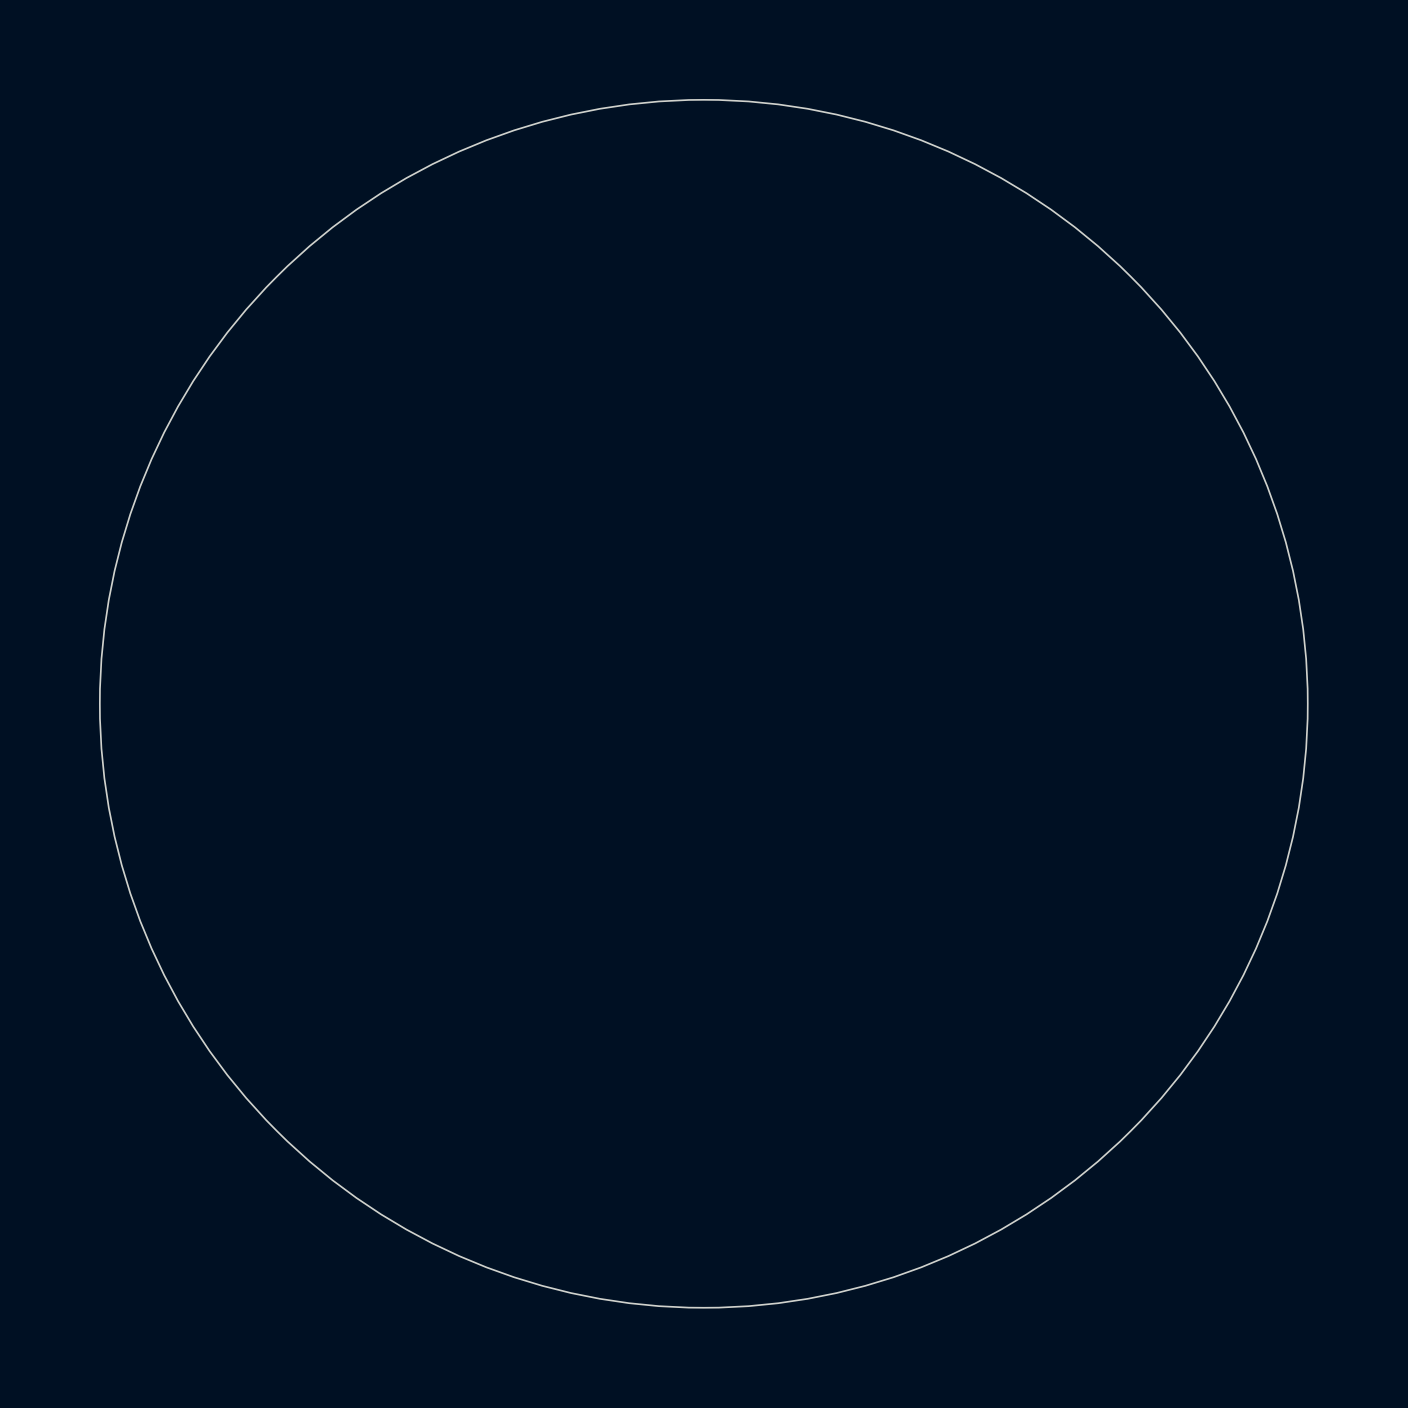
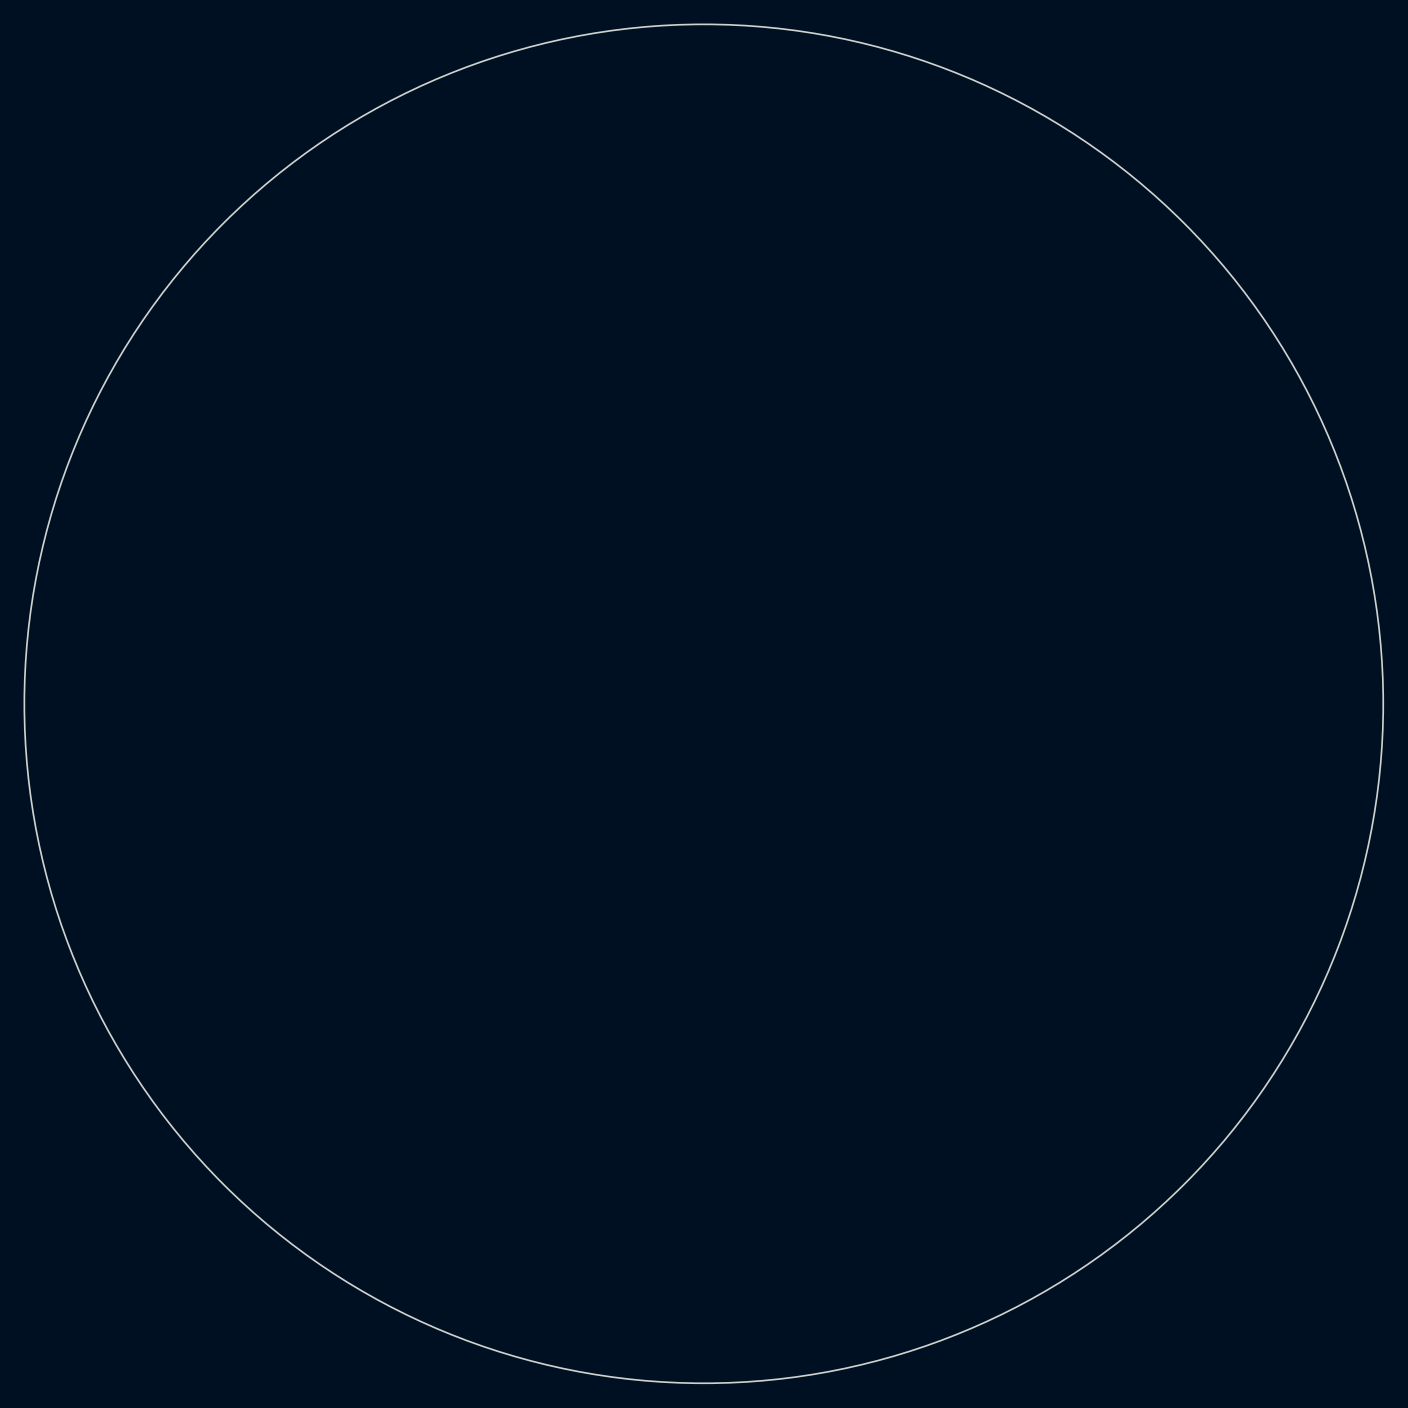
round board edge size: [99, 99, 1309, 1309] -> [24, 24, 1384, 1384]

